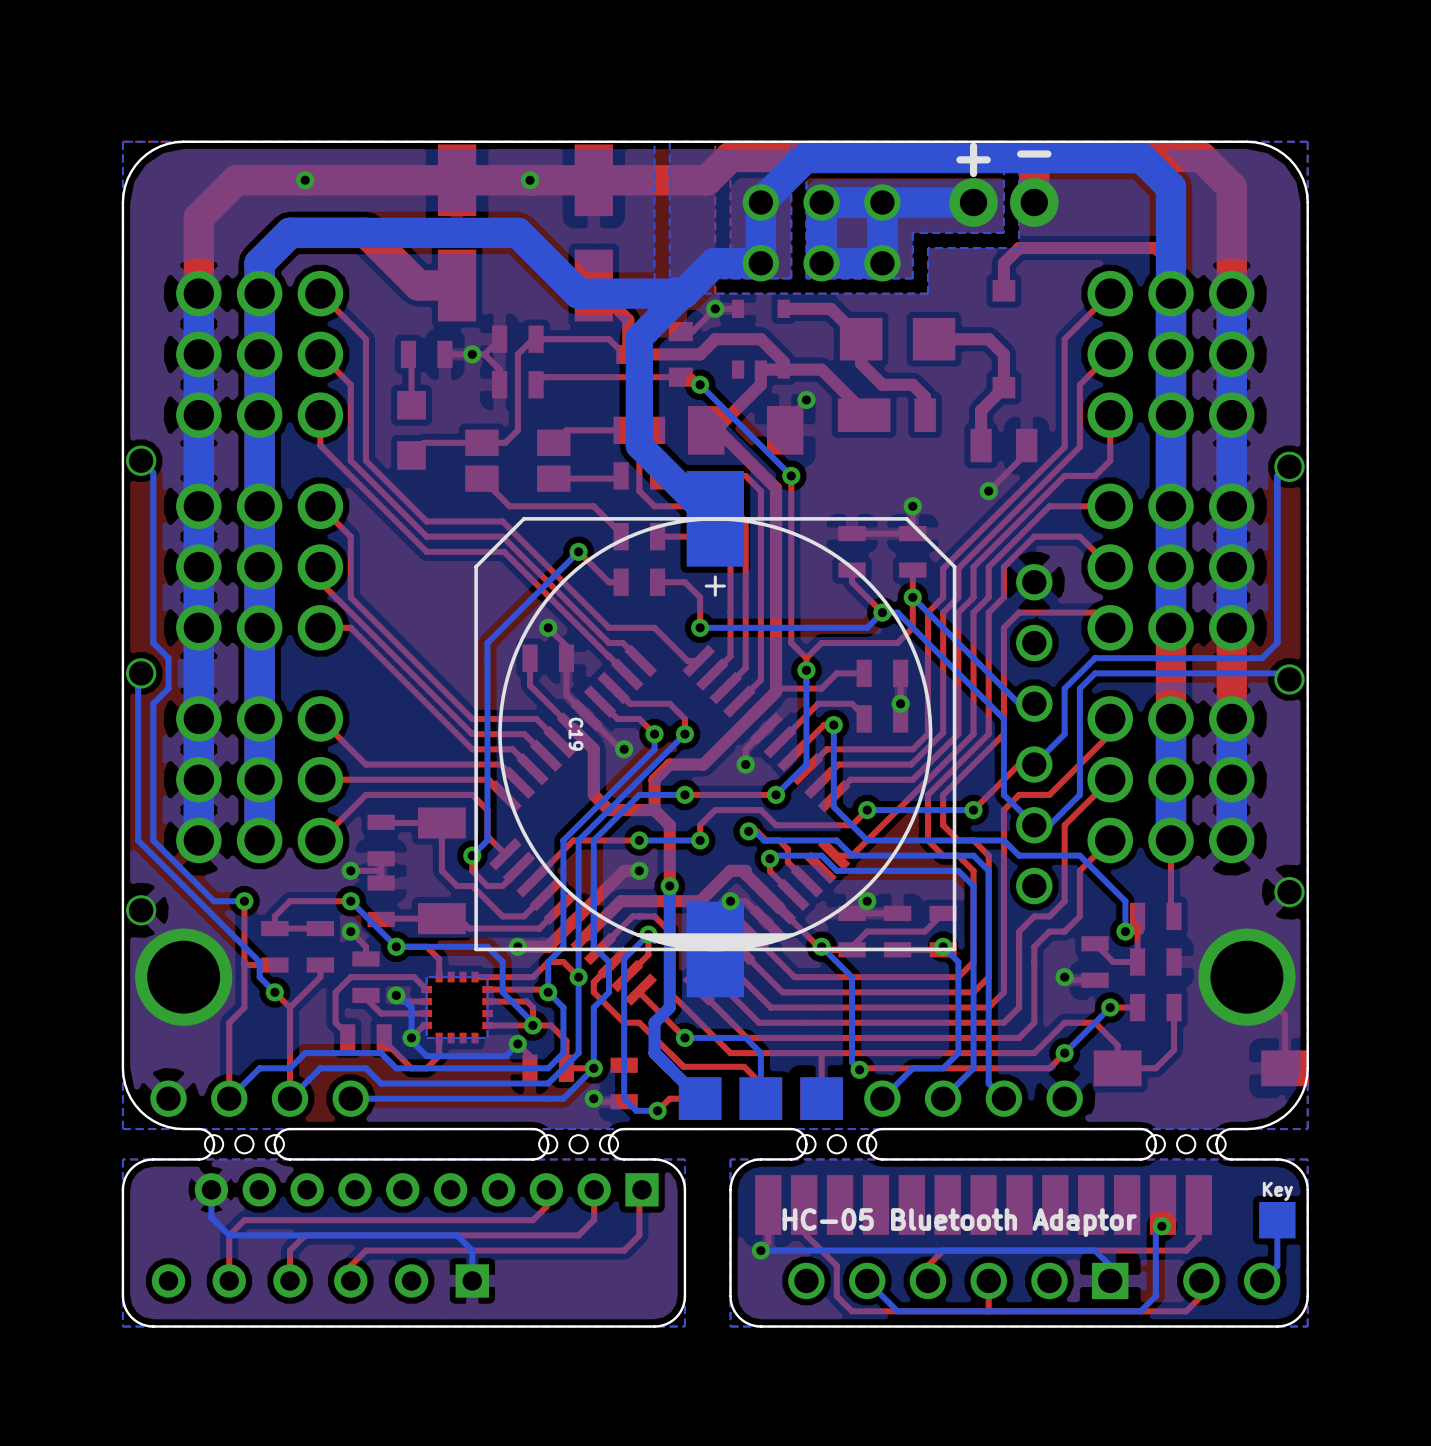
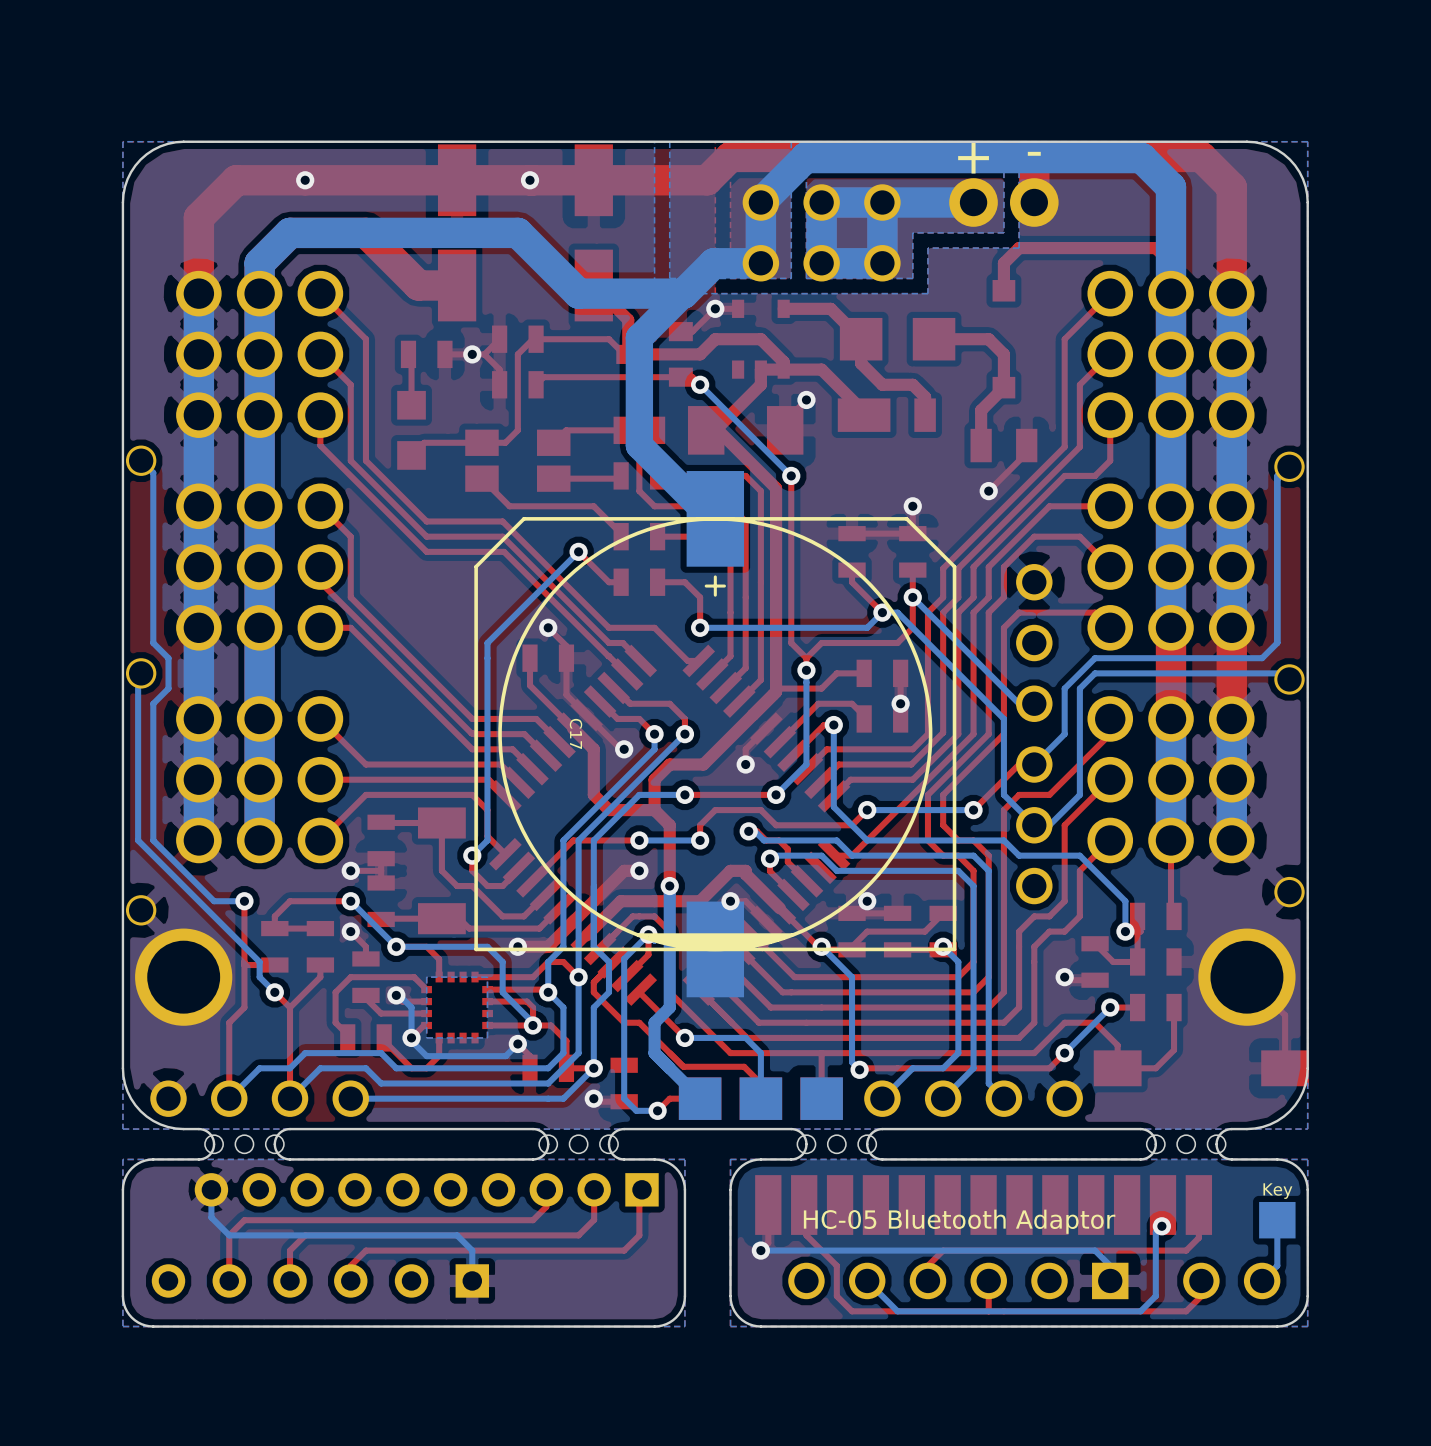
C19 name: C19 (576, 734) -> C17 (576, 733)

